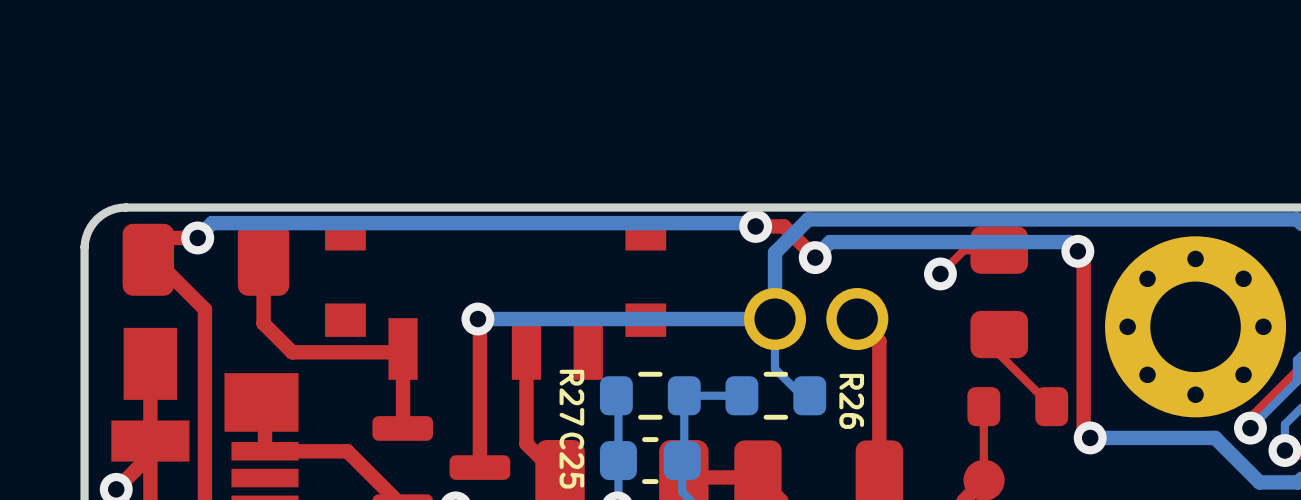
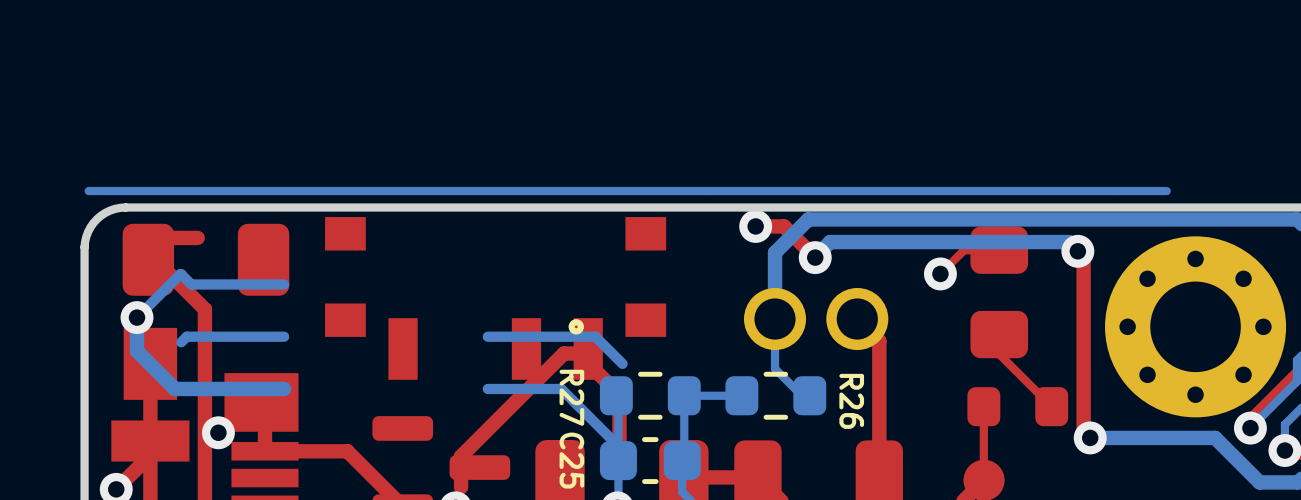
bottom track: none -> (1166, 191) (88, 191)
bottom track: (755, 226) (752, 223) (212, 223) (197, 237) -> none
via: (197, 237) -> none
top track: (263, 259) (263, 323) (292, 352) (399, 352) (403, 348) (403, 428) -> none
bottom track: none -> (284, 284) (191, 284) (180, 274) (137, 317) (137, 351) (174, 388) (284, 388)
via: none -> (137, 317)
top track: (477, 319) (479, 320) (479, 467) -> none
via: (477, 319) -> none
drawing: none -> [568, 319, 584, 335]
bottom track: (775, 319) (477, 319) -> none
bottom track: none -> (284, 336) (186, 336) (181, 342)
bottom track: none -> (487, 336) (595, 336) (622, 363)
top track: (526, 348) (526, 443) (560, 477) -> none
bottom track: none -> (487, 388) (561, 388) (622, 450)
via: none -> (218, 432)
top track: none -> (619, 448) (619, 394) (578, 353) (563, 353) (461, 456) (461, 487)

